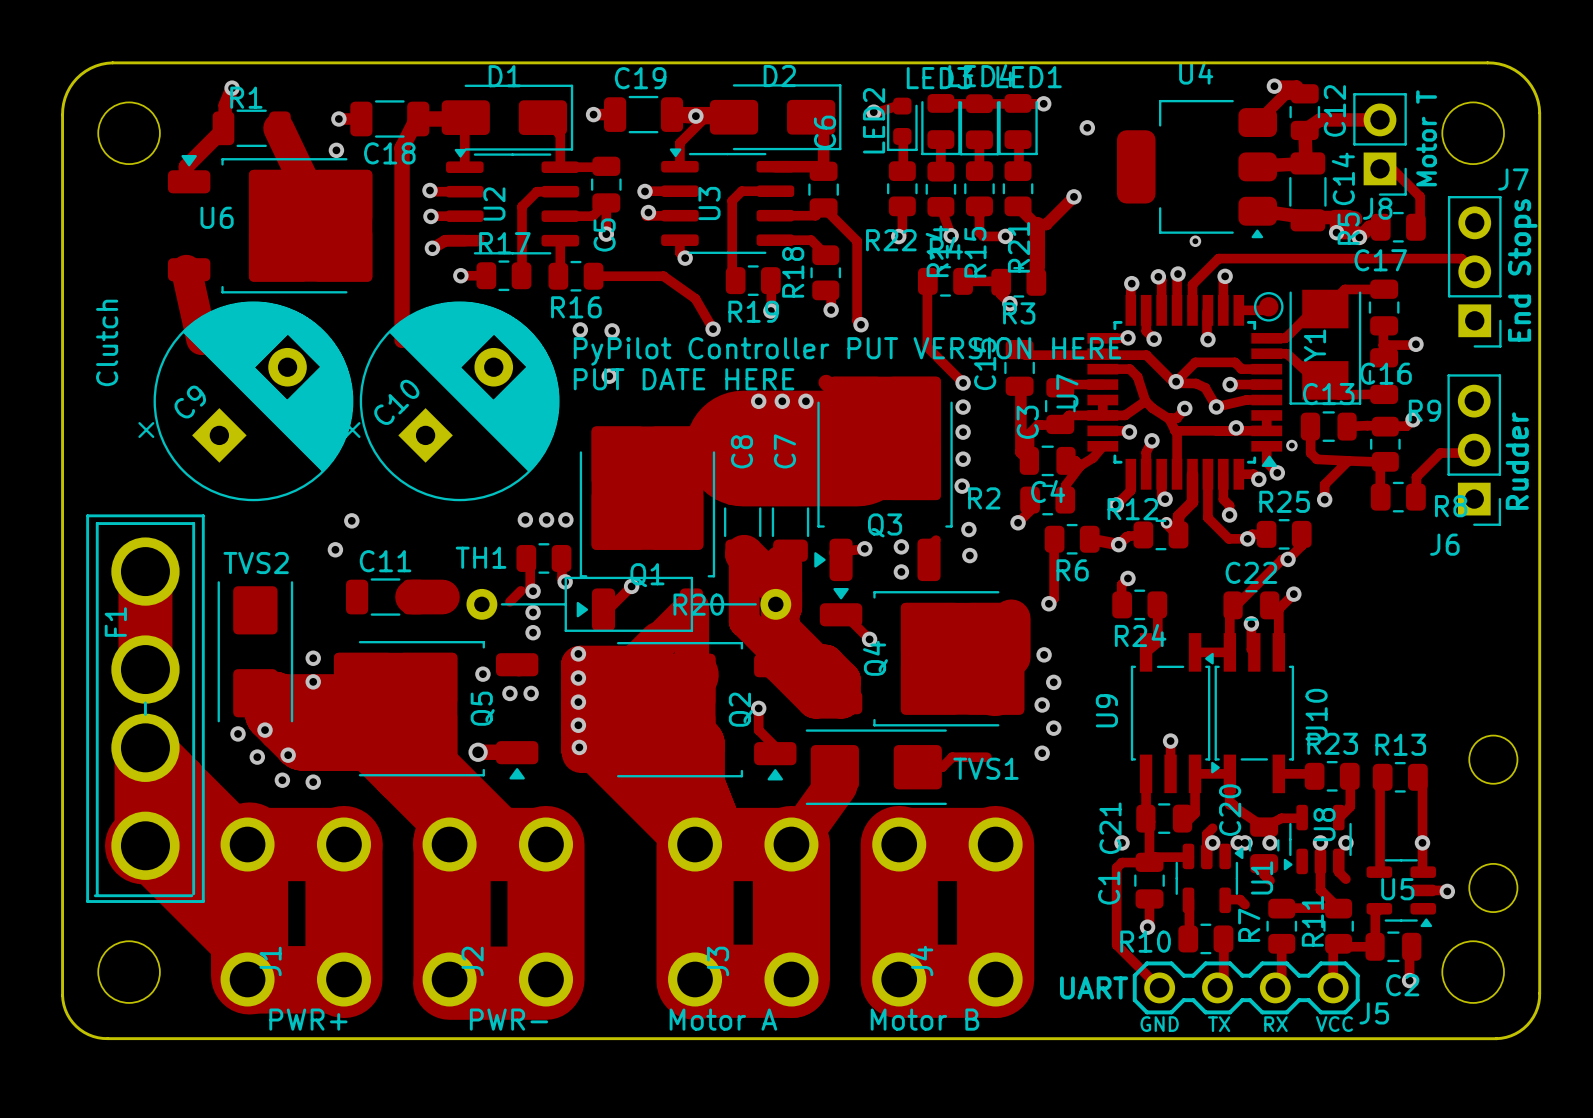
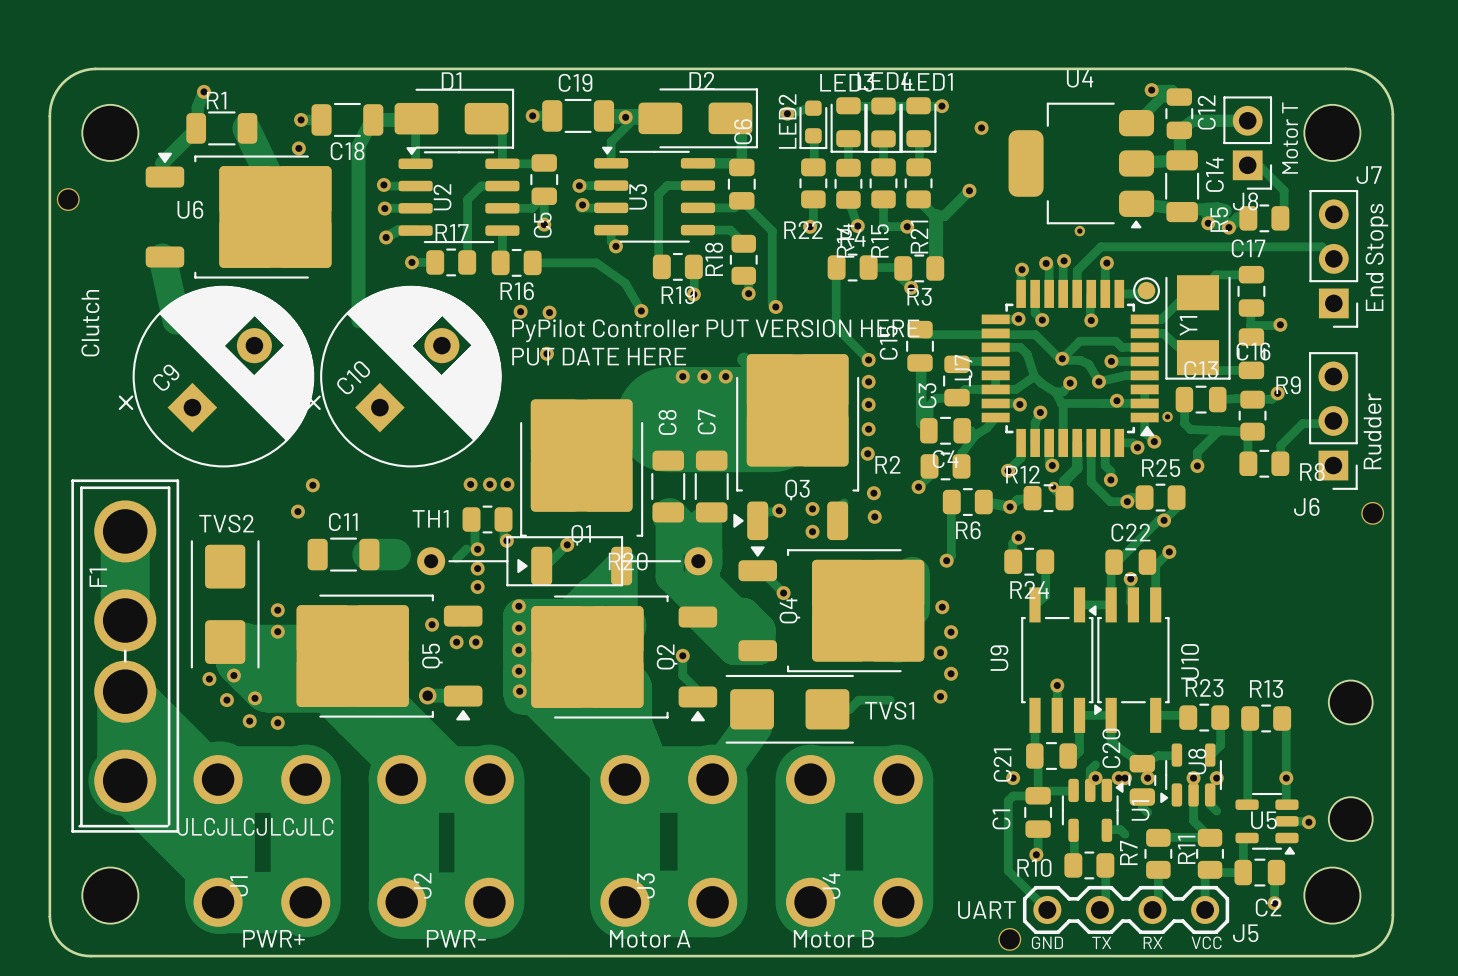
part: none -> (68, 199)
part: none -> (1372, 513)
text: none -> JLCJLCJLCJLC (255, 826)
part: none -> (1009, 939)

